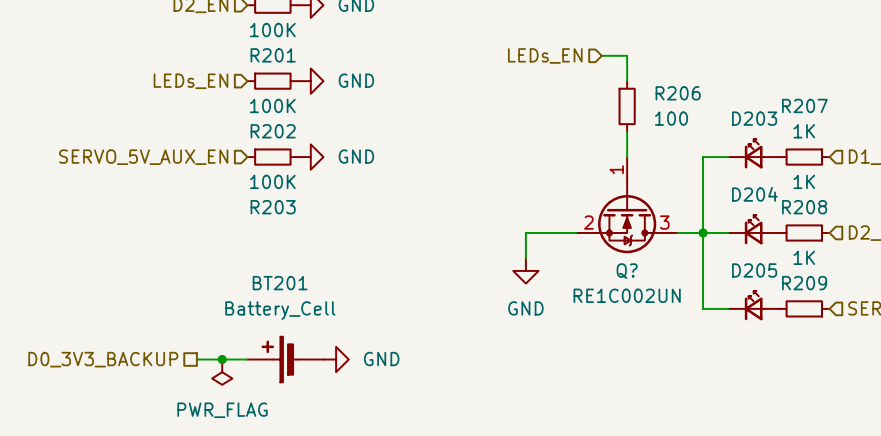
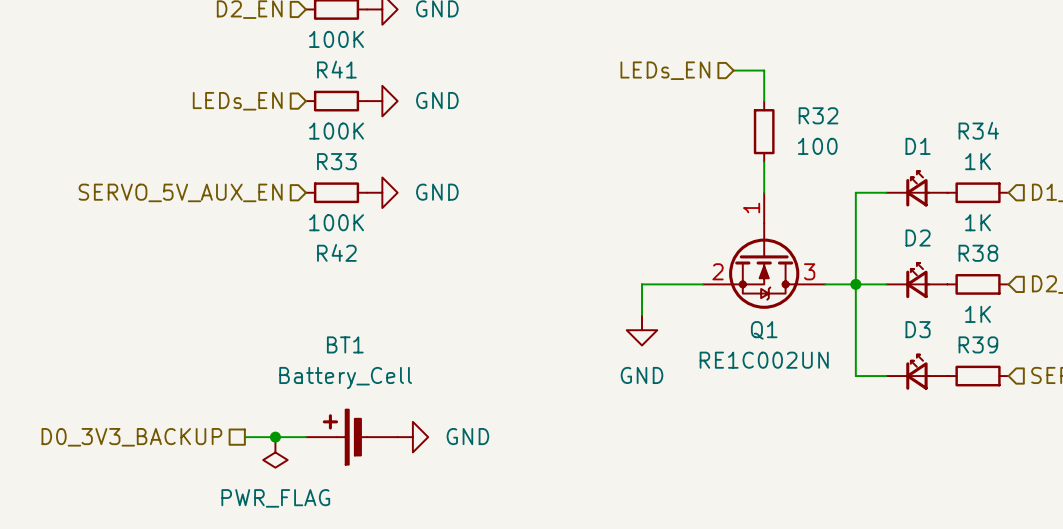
R201 name: R201 (273, 55) -> R41 (336, 69)
R206 name: R206 (678, 93) -> R32 (818, 115)
R207 name: R207 (804, 105) -> R34 (978, 130)
D203 name: D203 (754, 118) -> D1 (918, 146)
R202 name: R202 (273, 131) -> R33 (336, 161)
D204 name: D204 (754, 194) -> D2 (918, 238)
R203 name: R203 (273, 207) -> R42 (336, 252)
R208 name: R208 (804, 207) -> R38 (978, 253)
D205 name: D205 (754, 270) -> D3 (918, 329)
Q? name: Q? (627, 271) -> Q1 (764, 330)
BT201 name: BT201 (280, 283) -> BT1 (345, 344)
R209 name: R209 (804, 283) -> R39 (978, 344)

